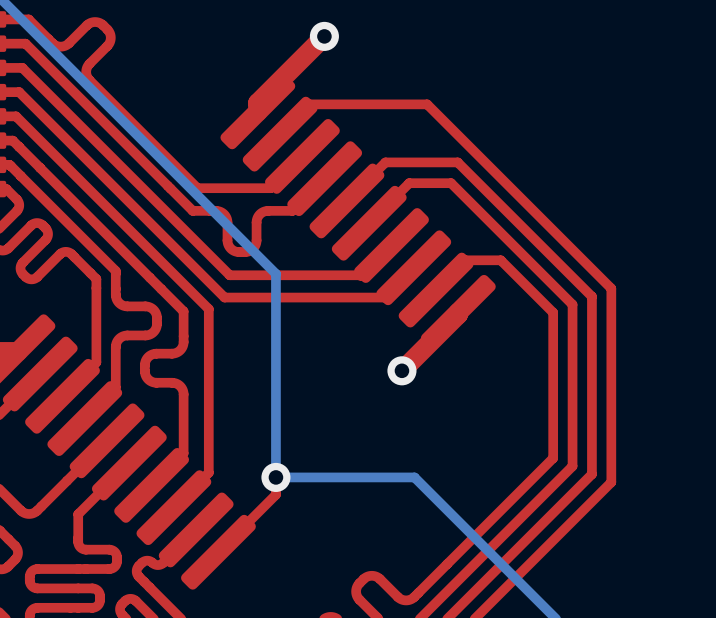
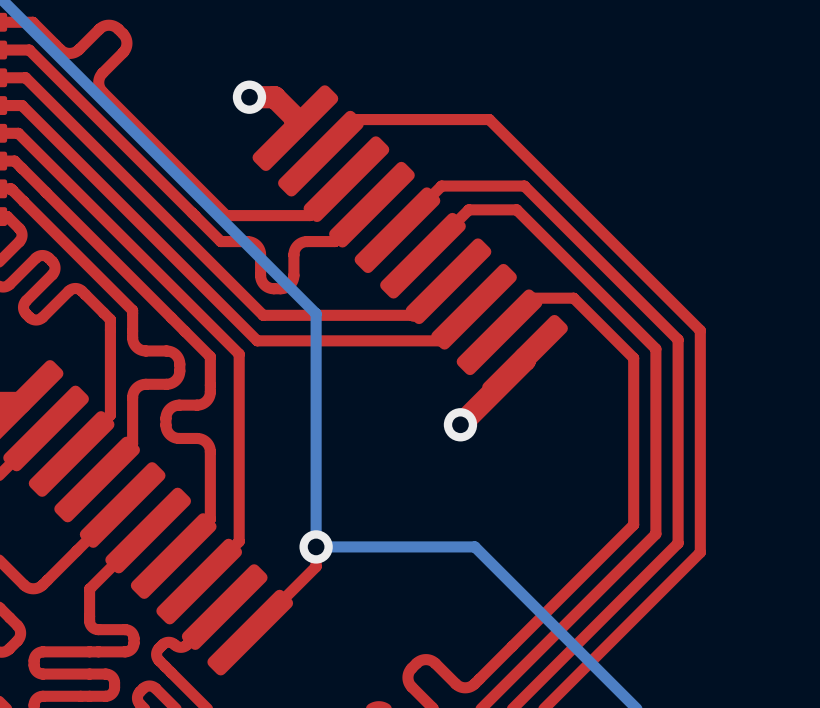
top track: (324, 36) (257, 102) -> (249, 97) (274, 97) (295, 117)
via position: (324, 36) -> (249, 97)

